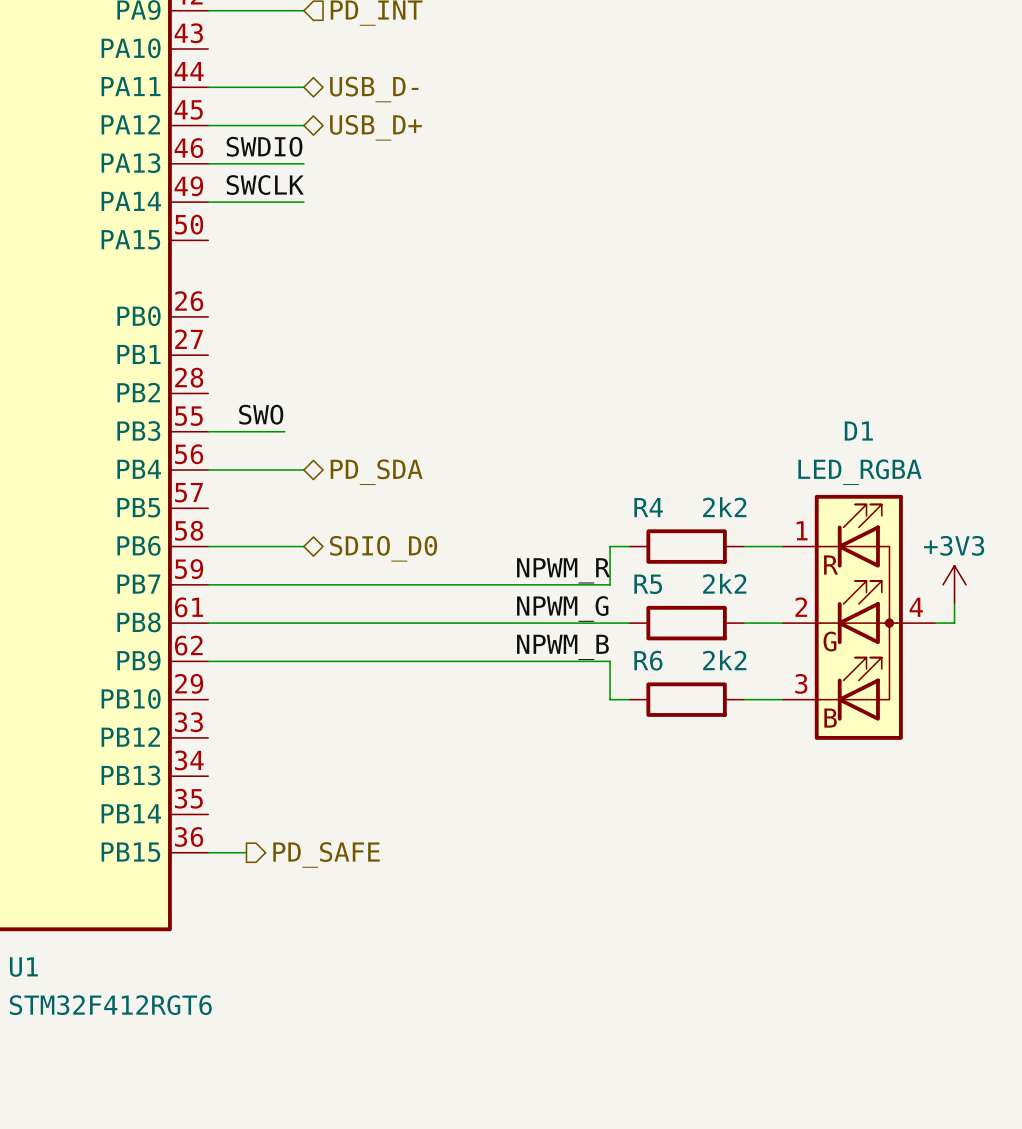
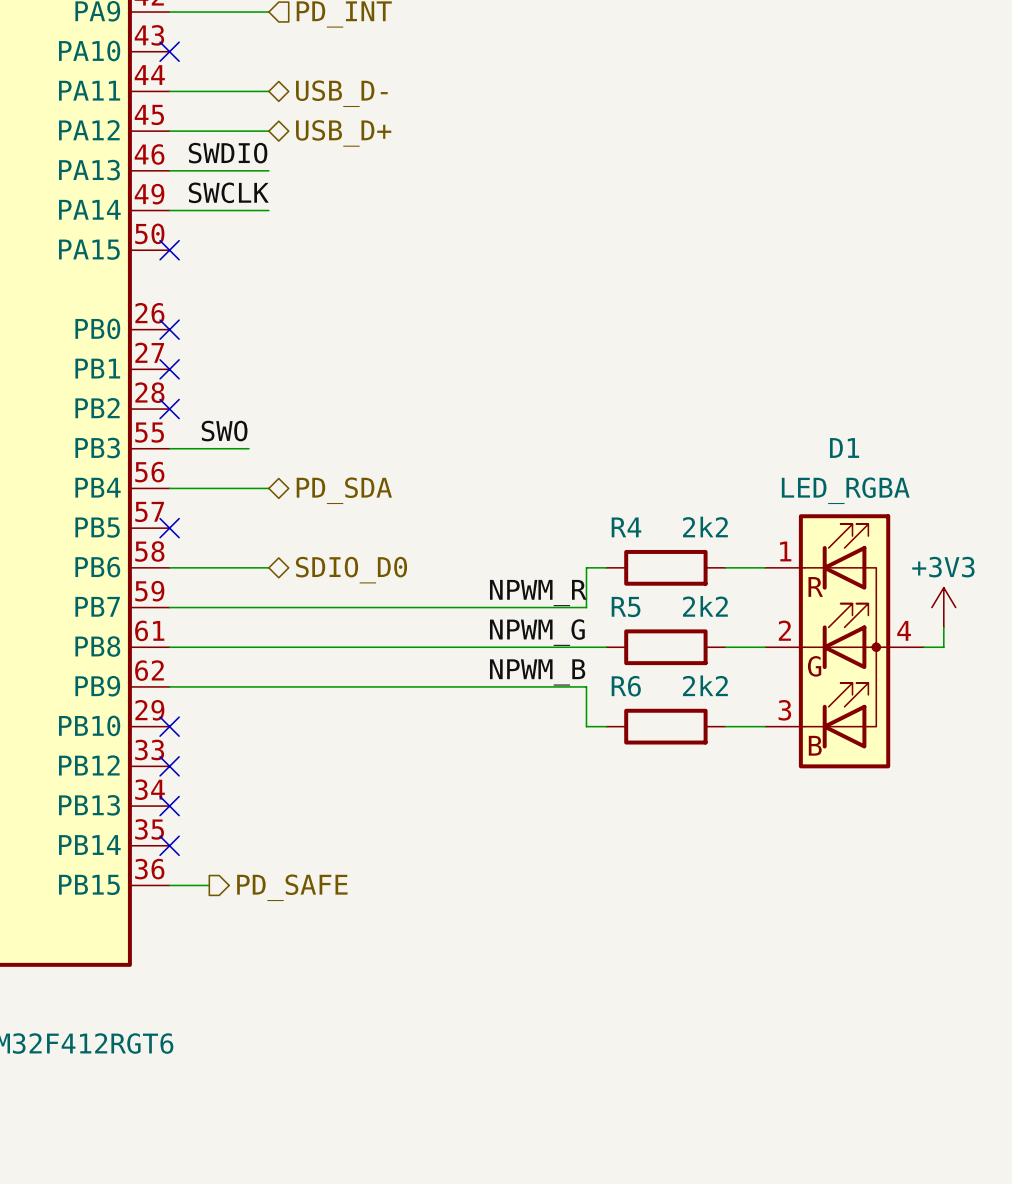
no-connect mark: none -> (169, 51)
no-connect mark: none -> (169, 250)
no-connect mark: none -> (169, 329)
no-connect mark: none -> (169, 369)
no-connect mark: none -> (169, 409)
no-connect mark: none -> (169, 528)
no-connect mark: none -> (169, 726)
no-connect mark: none -> (169, 766)
no-connect mark: none -> (169, 806)
no-connect mark: none -> (169, 845)

